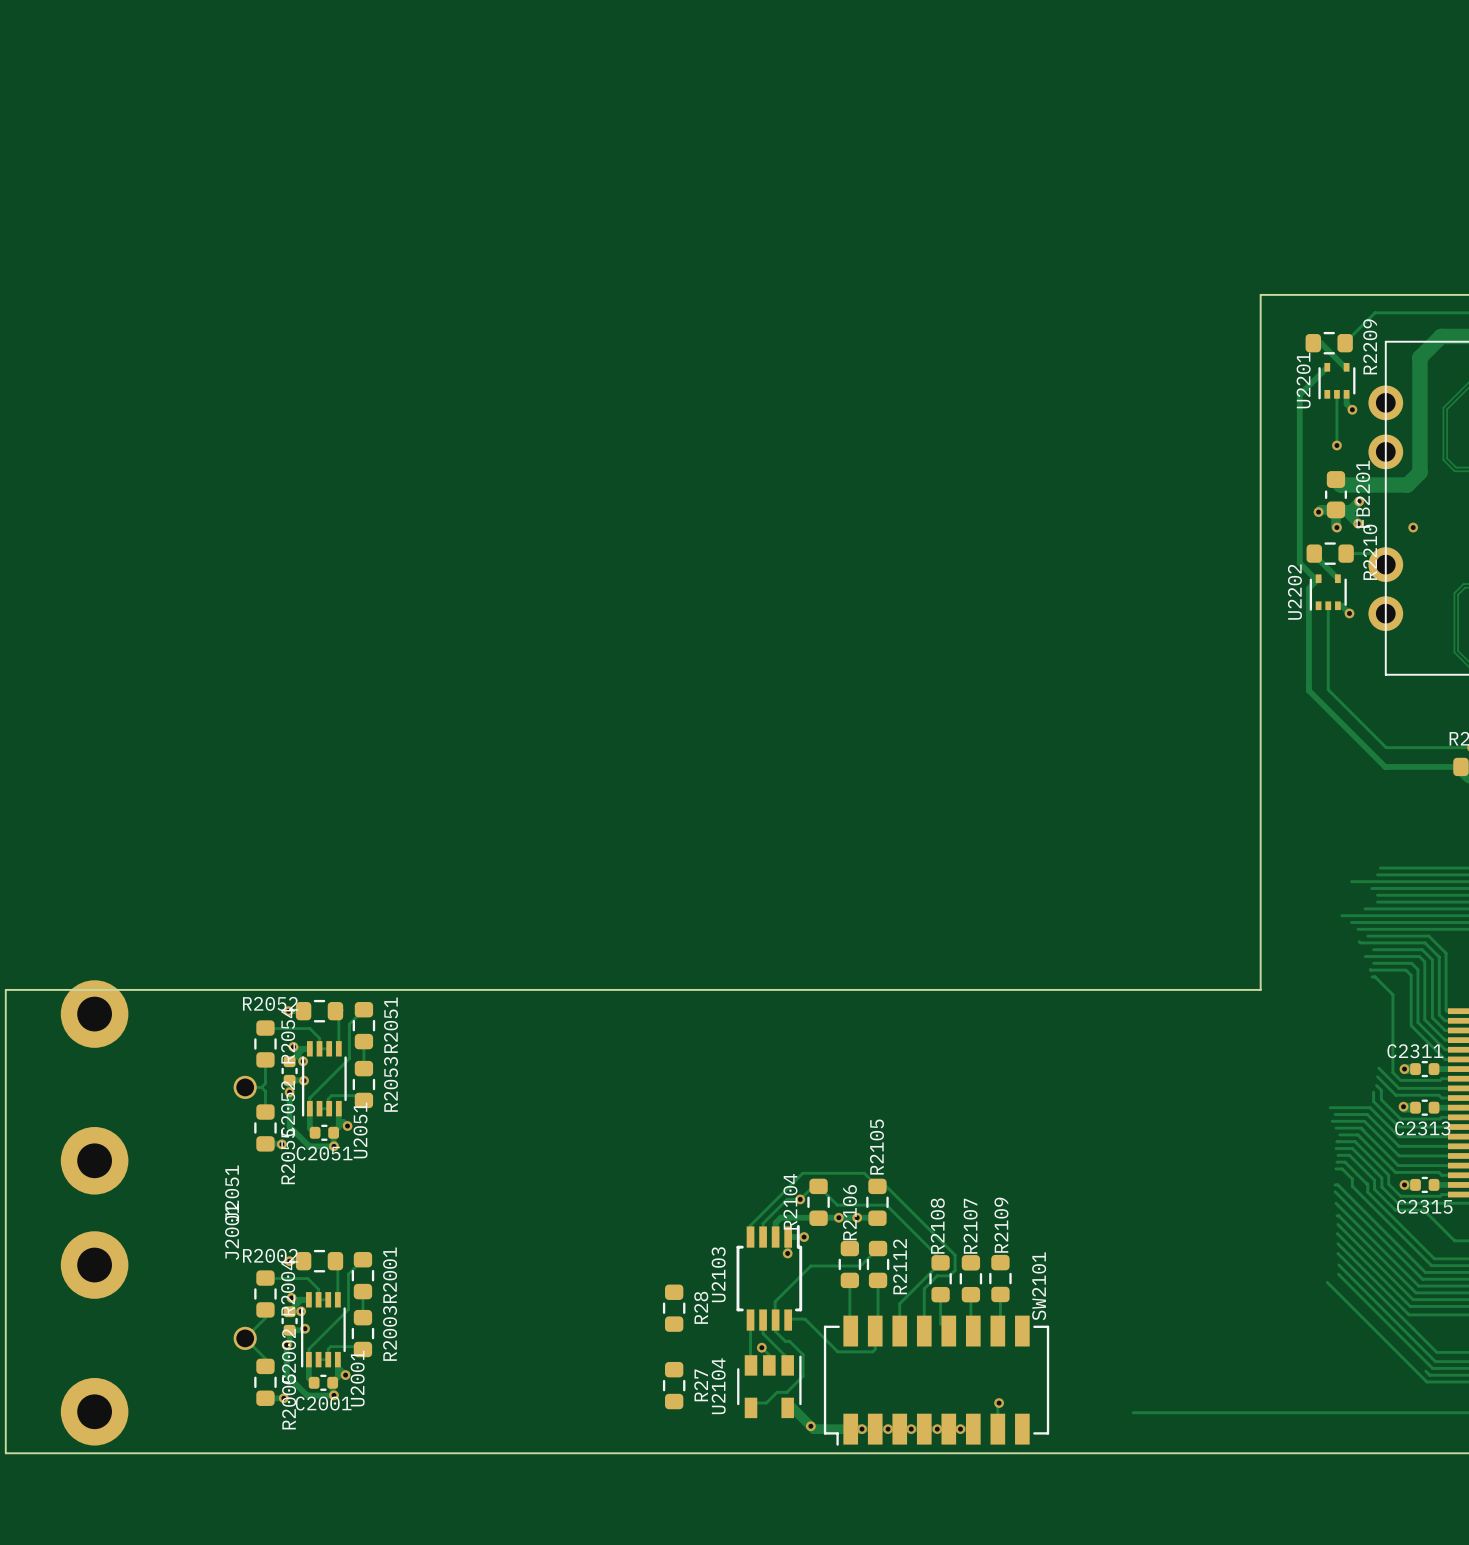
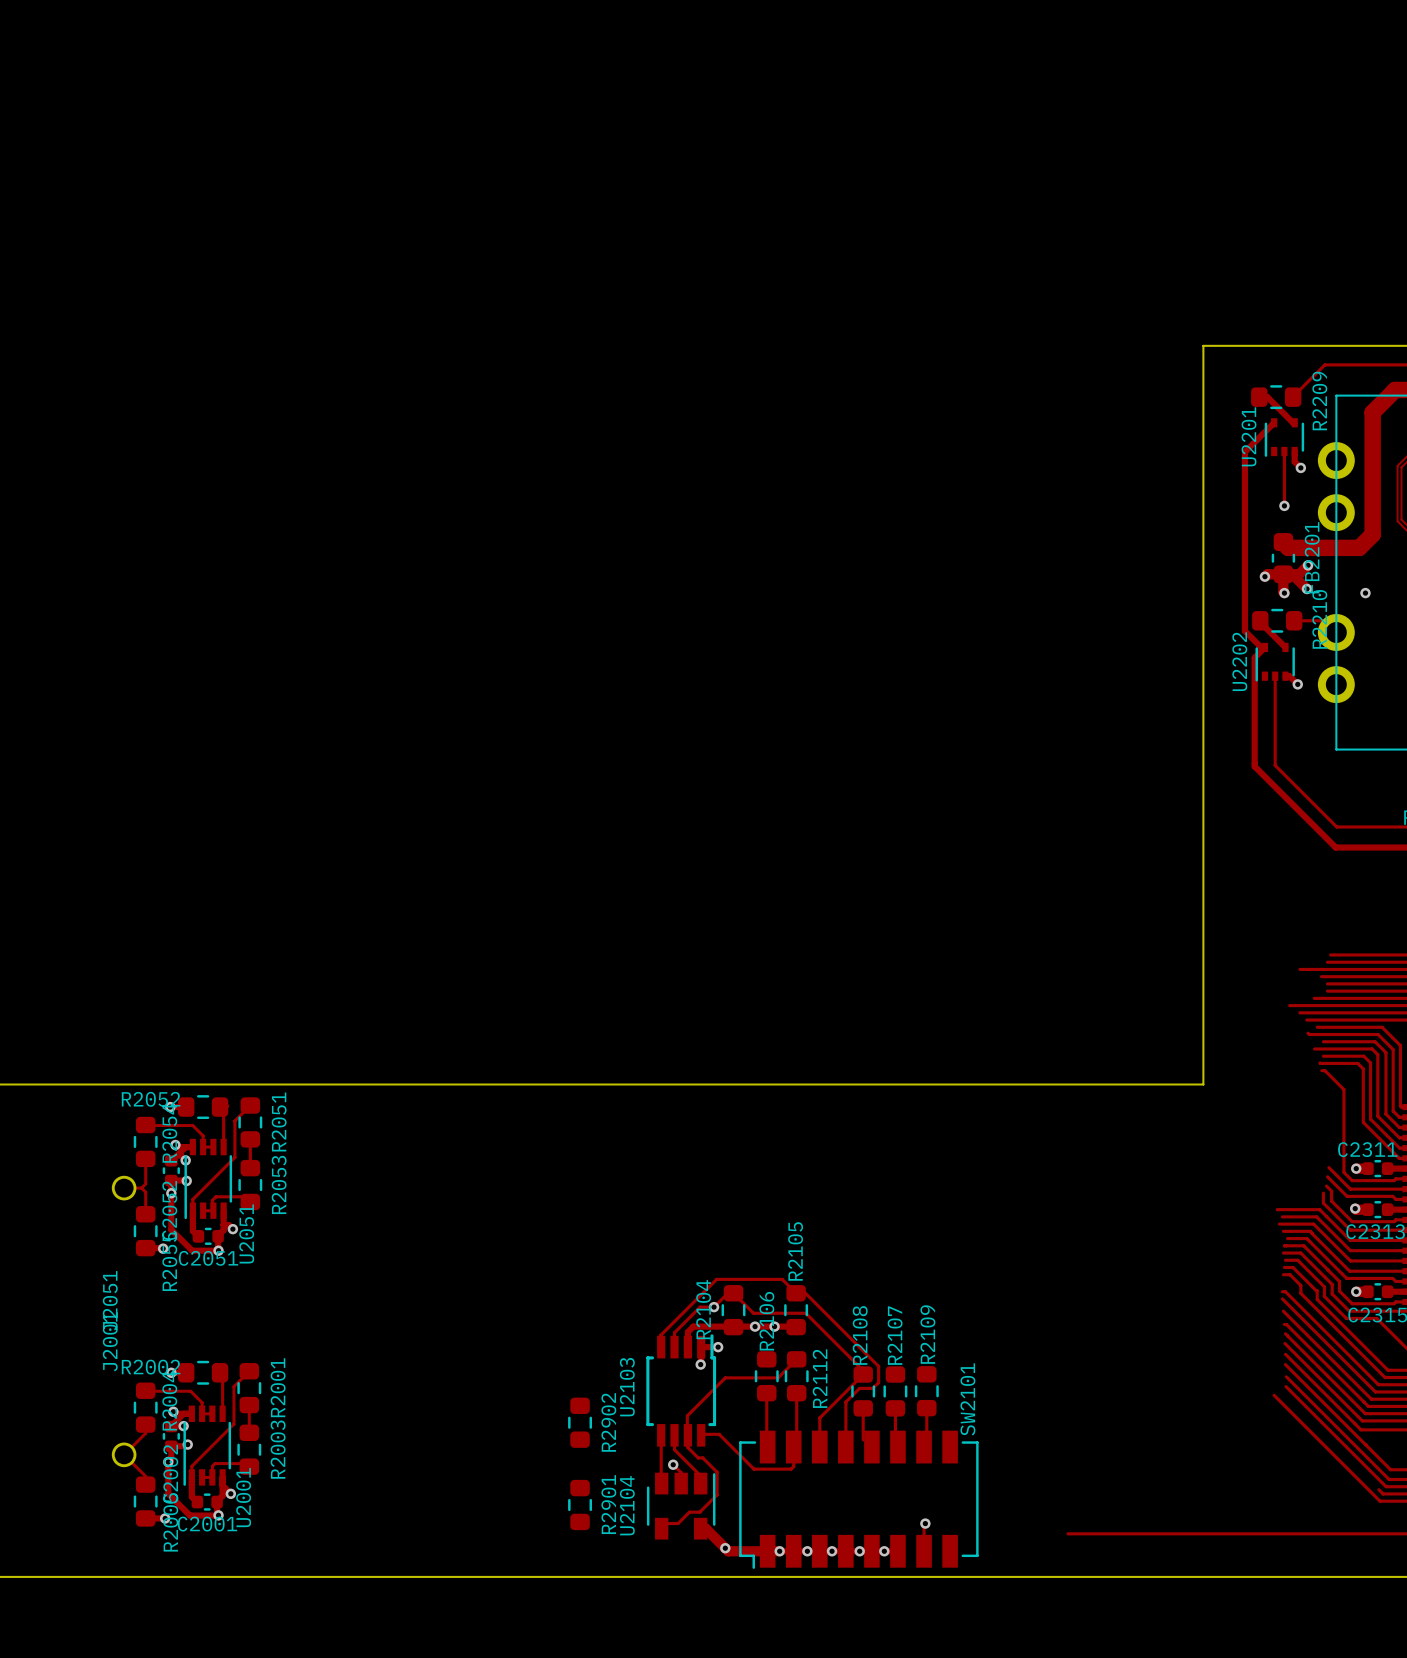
R28 name: R28 (701, 1307) -> R2902 (608, 1422)
R27 name: R27 (701, 1385) -> R2901 (608, 1504)

